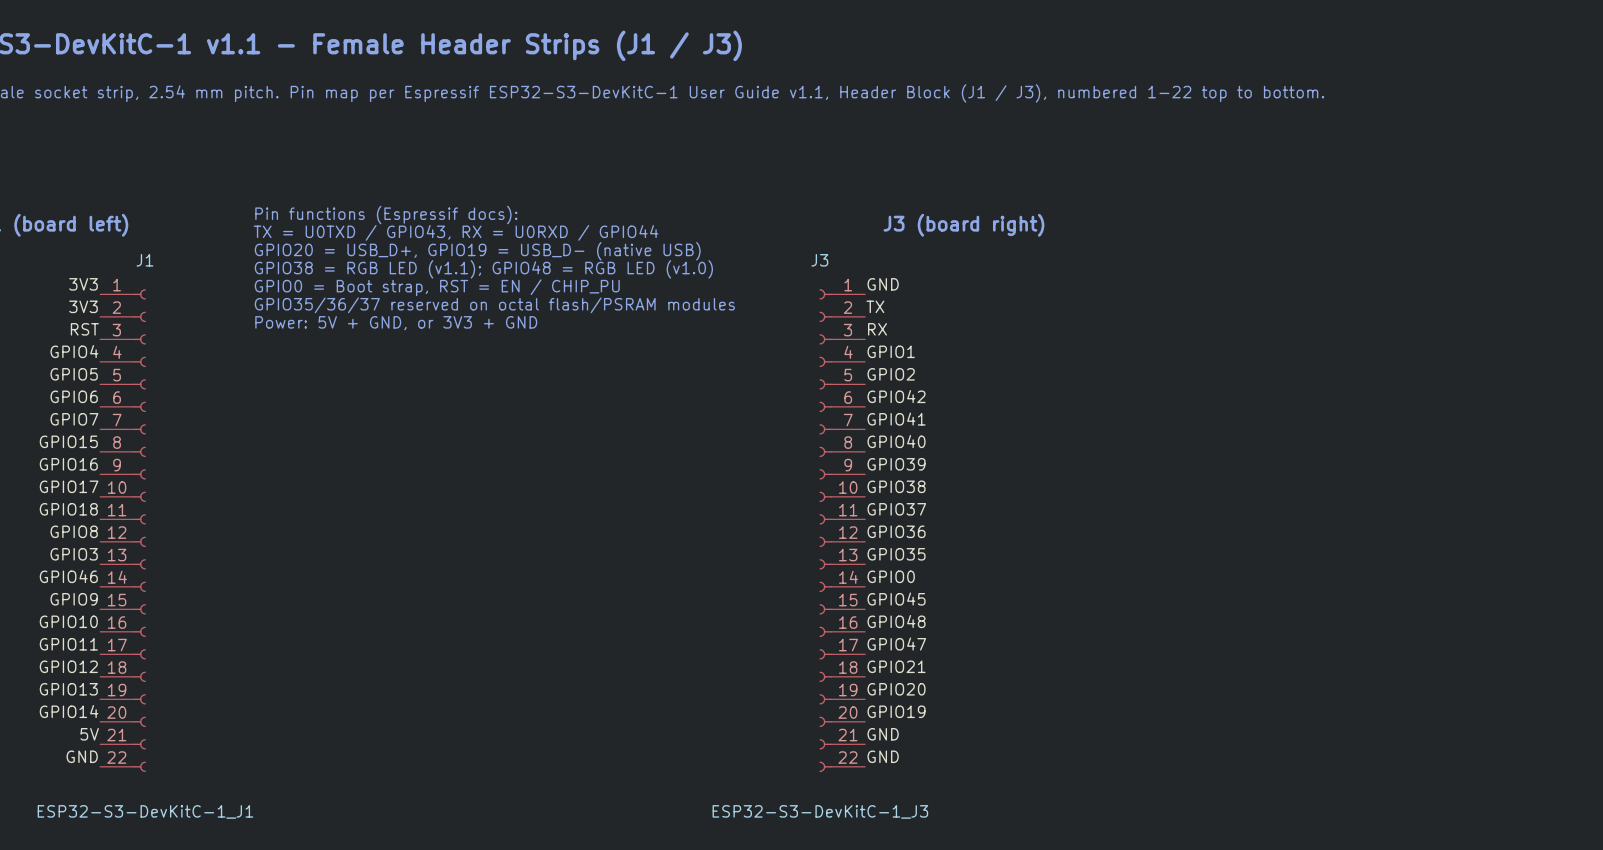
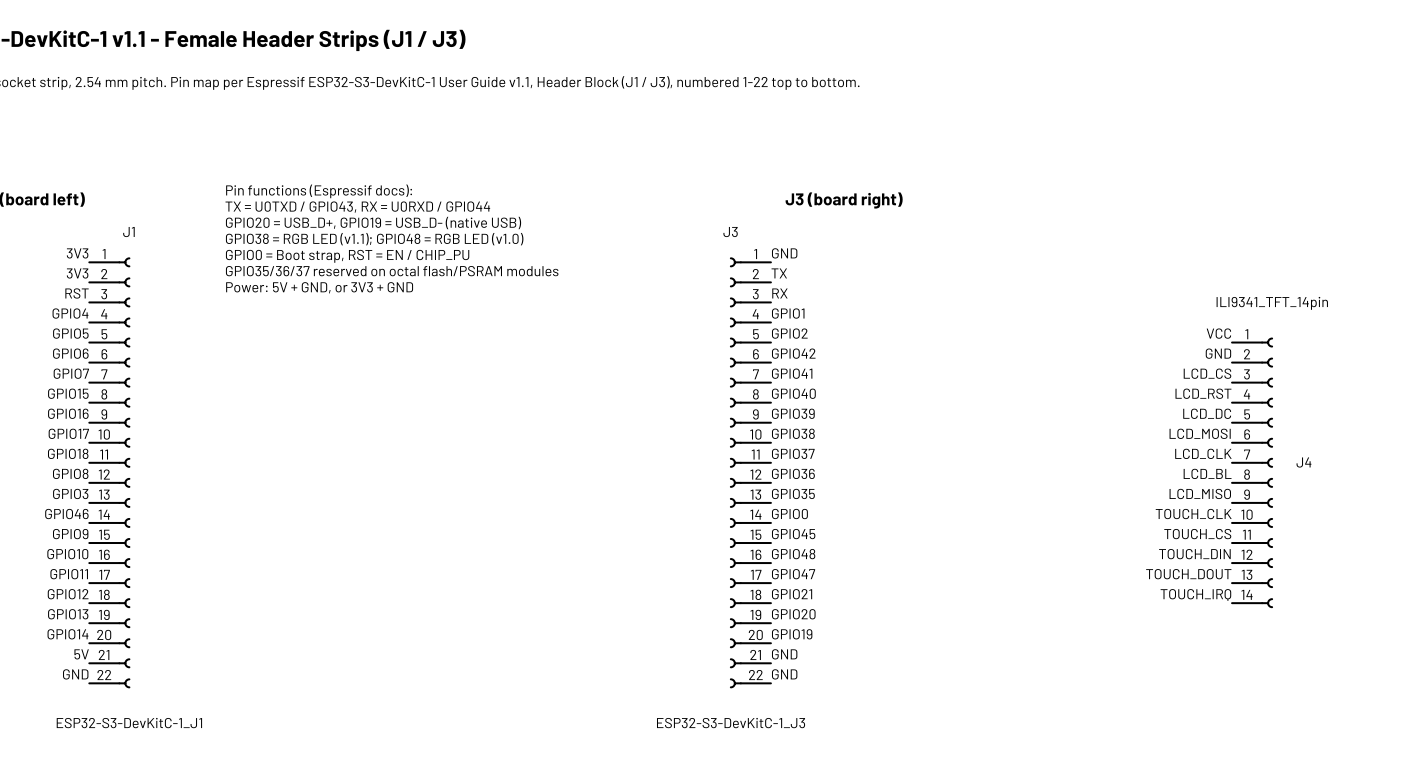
label: none -> VCC (1218, 333)
label: none -> GND (1218, 353)
label: none -> LCD_CS (1207, 373)
label: none -> LCD_RST (1203, 393)
label: none -> LCD_DC (1207, 413)
label: none -> LCD_MOSI (1200, 433)
label: none -> LCD_CLK (1203, 453)
J4: none -> ILI9341_TFT_14pin (1252, 472)
label: none -> LCD_BL (1207, 473)
label: none -> LCD_MISO (1200, 493)
label: none -> TOUCH_CLK (1193, 514)
label: none -> TOUCH_CS (1197, 534)
label: none -> TOUCH_DIN (1194, 554)
label: none -> TOUCH_DOUT (1188, 574)
label: none -> TOUCH_IRQ (1195, 594)

